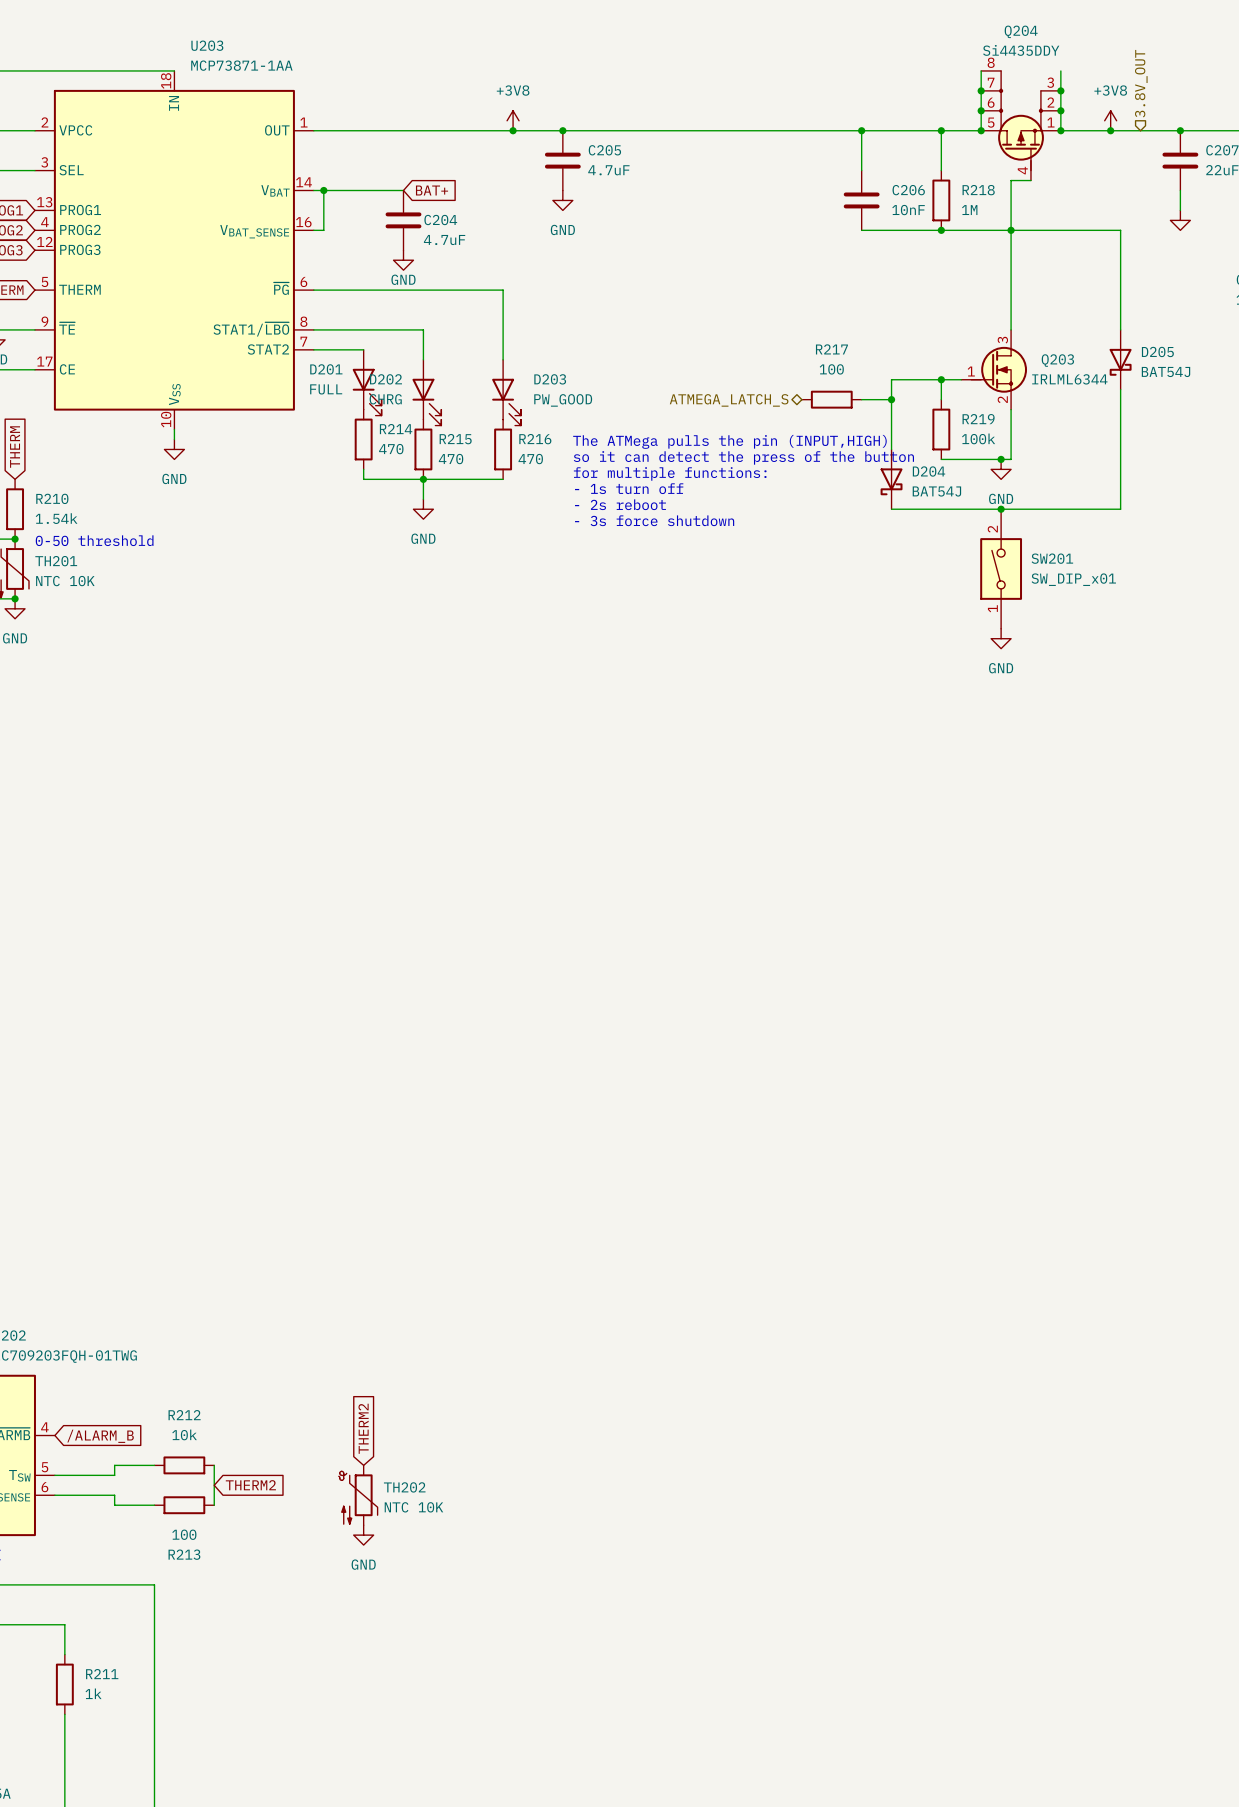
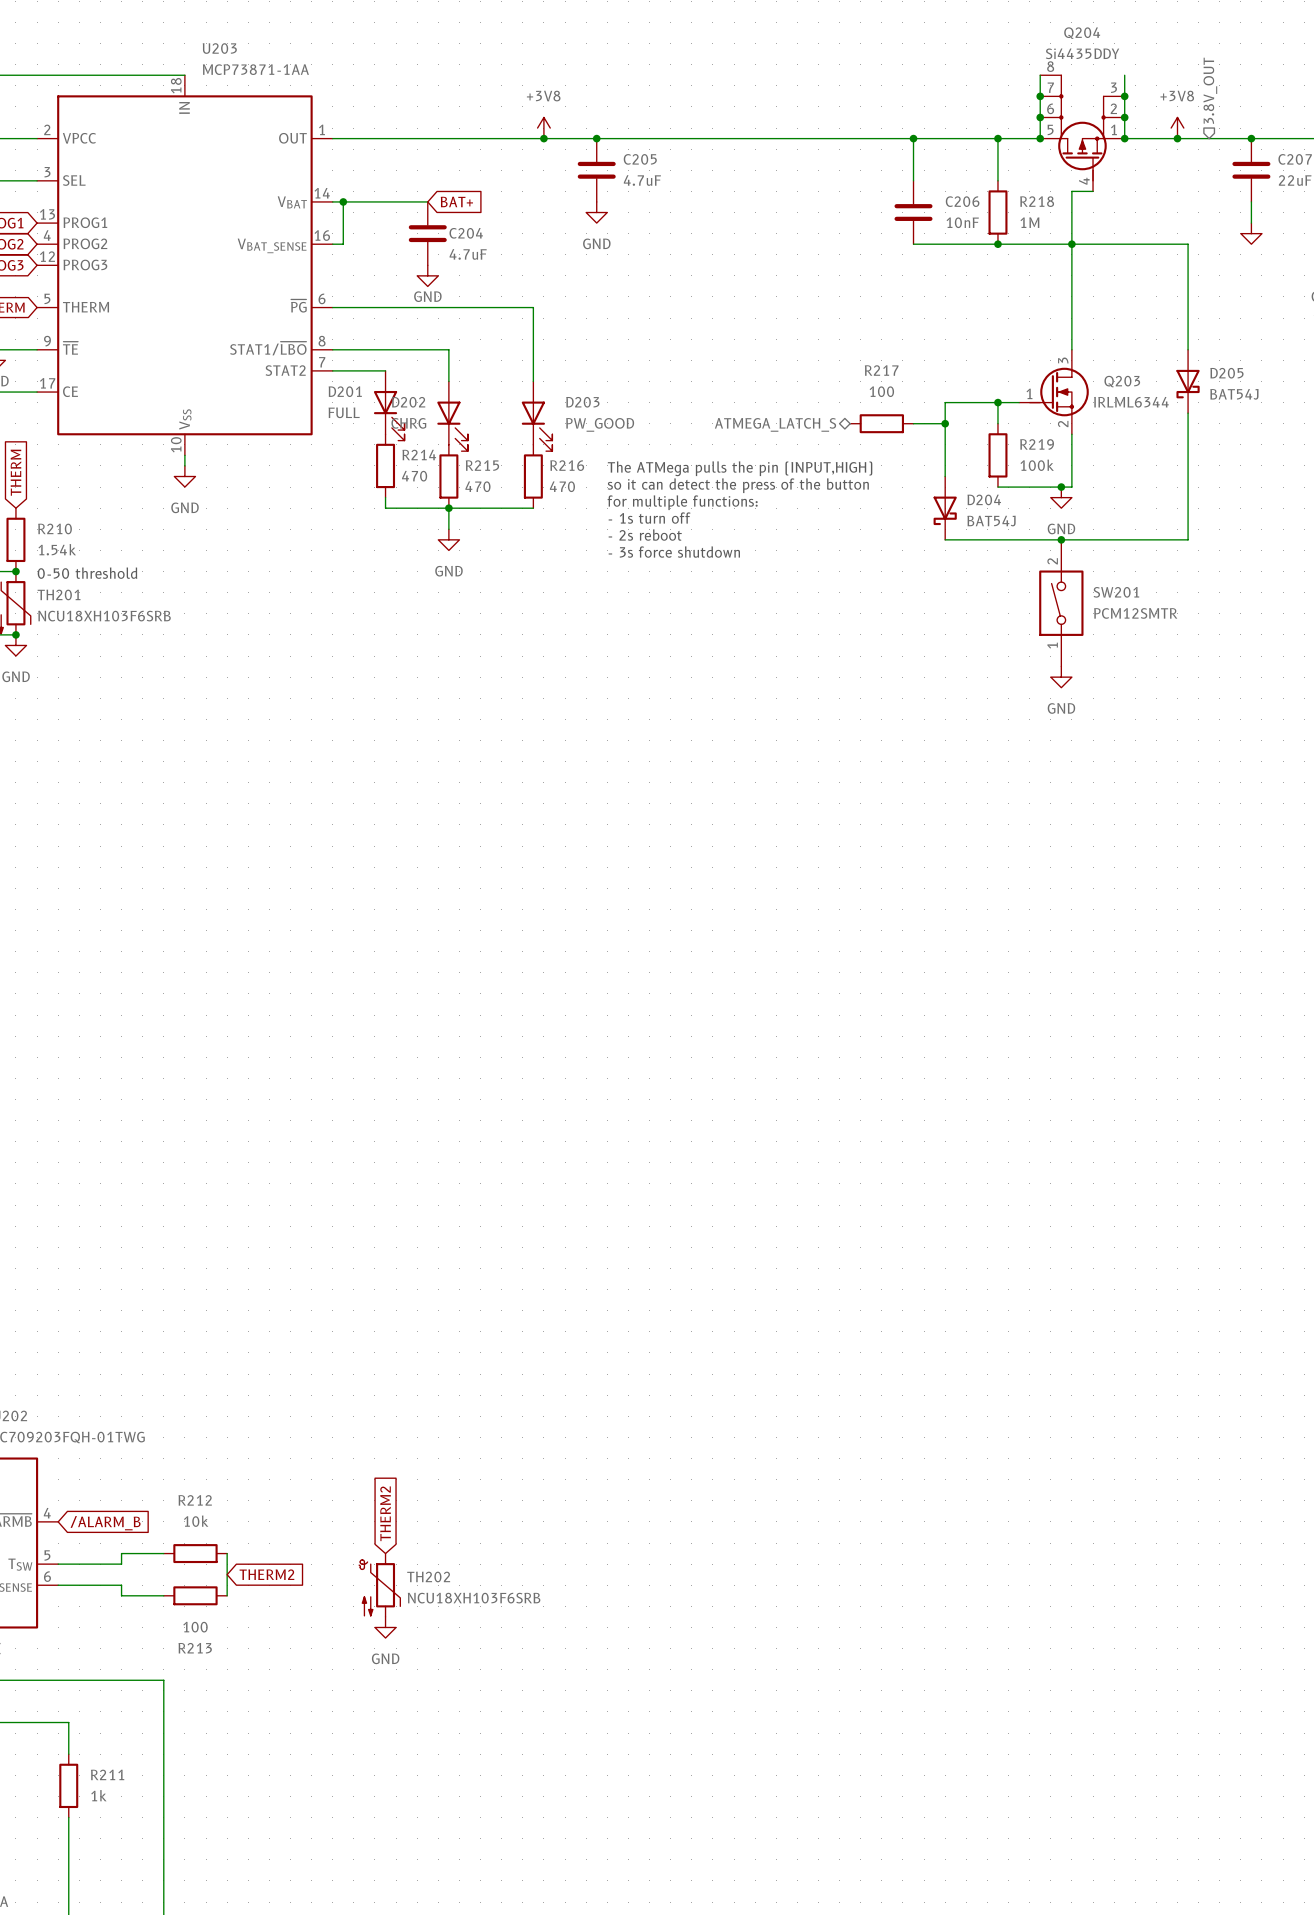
SW201 value: SW_DIP_x01 (1073, 579) -> PCM12SMTR (1135, 613)
TH201 value: NTC 10K (65, 581) -> NCU18XH103F6SRB (104, 616)
TH202 value: NTC 10K (413, 1507) -> NCU18XH103F6SRB (474, 1598)

